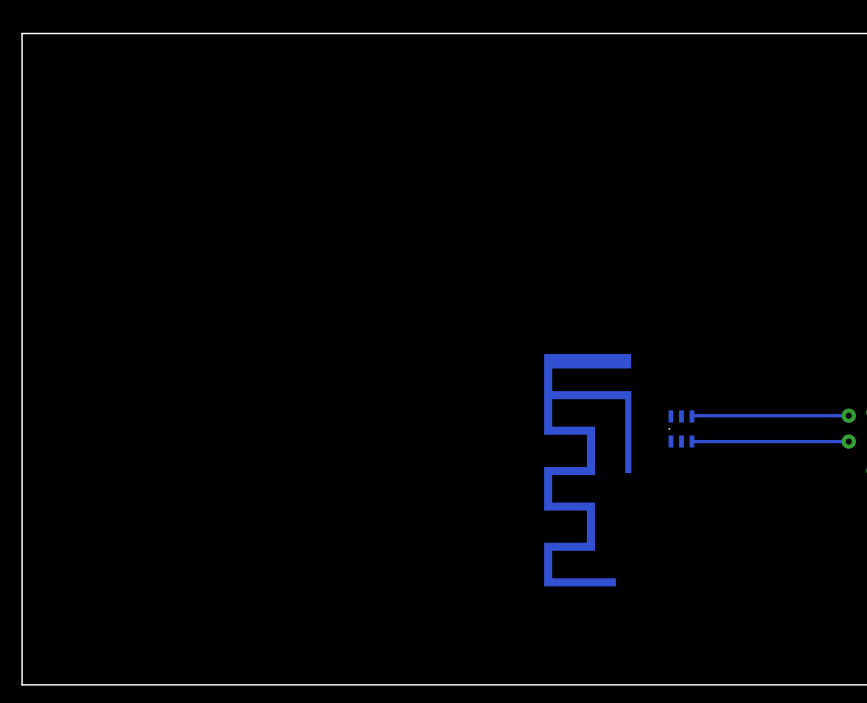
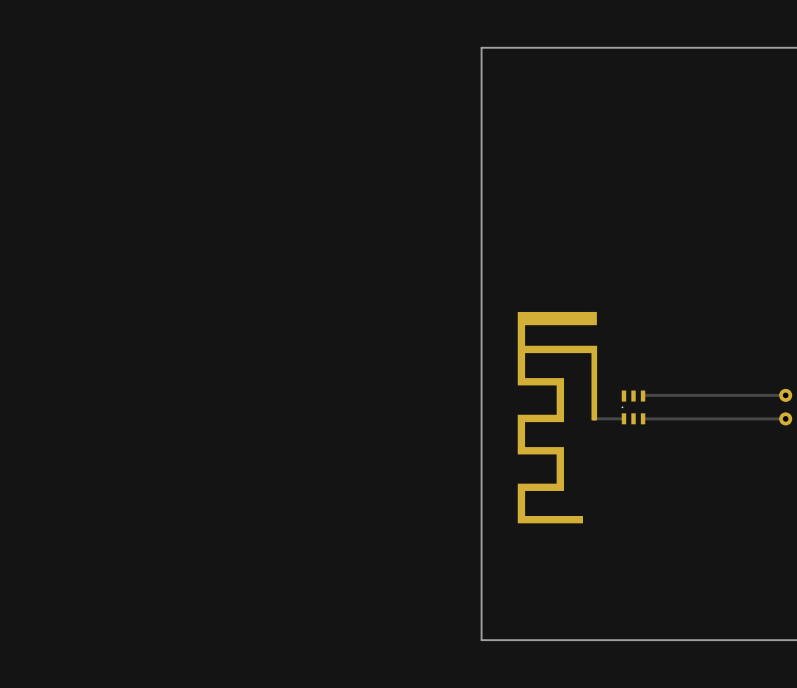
board edge: (514, 33) (22, 33) (22, 684) (514, 684) -> (481, 47) (481, 640)
part: none -> (557, 417)
track: none -> (623, 418) (594, 418)
part: (587, 470) -> none

